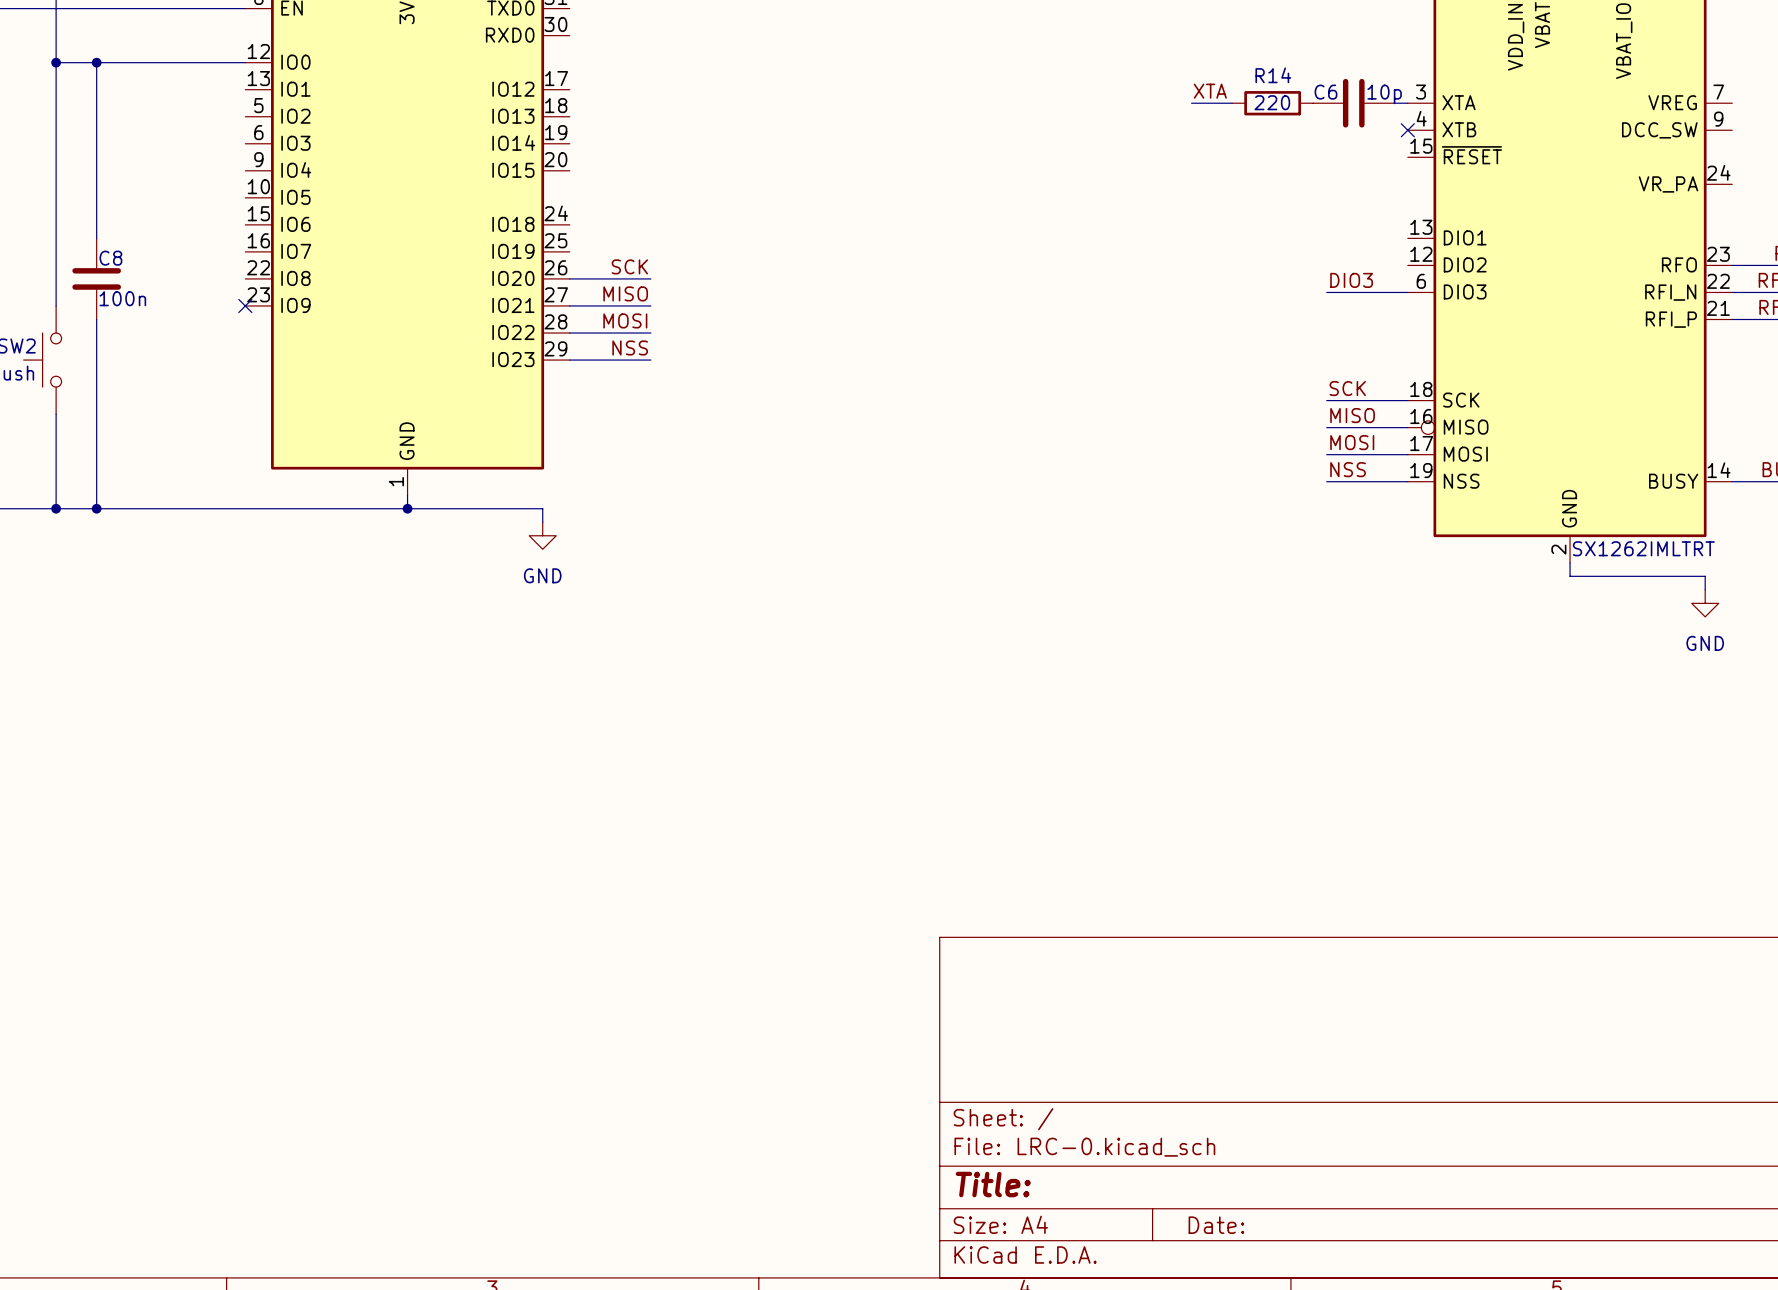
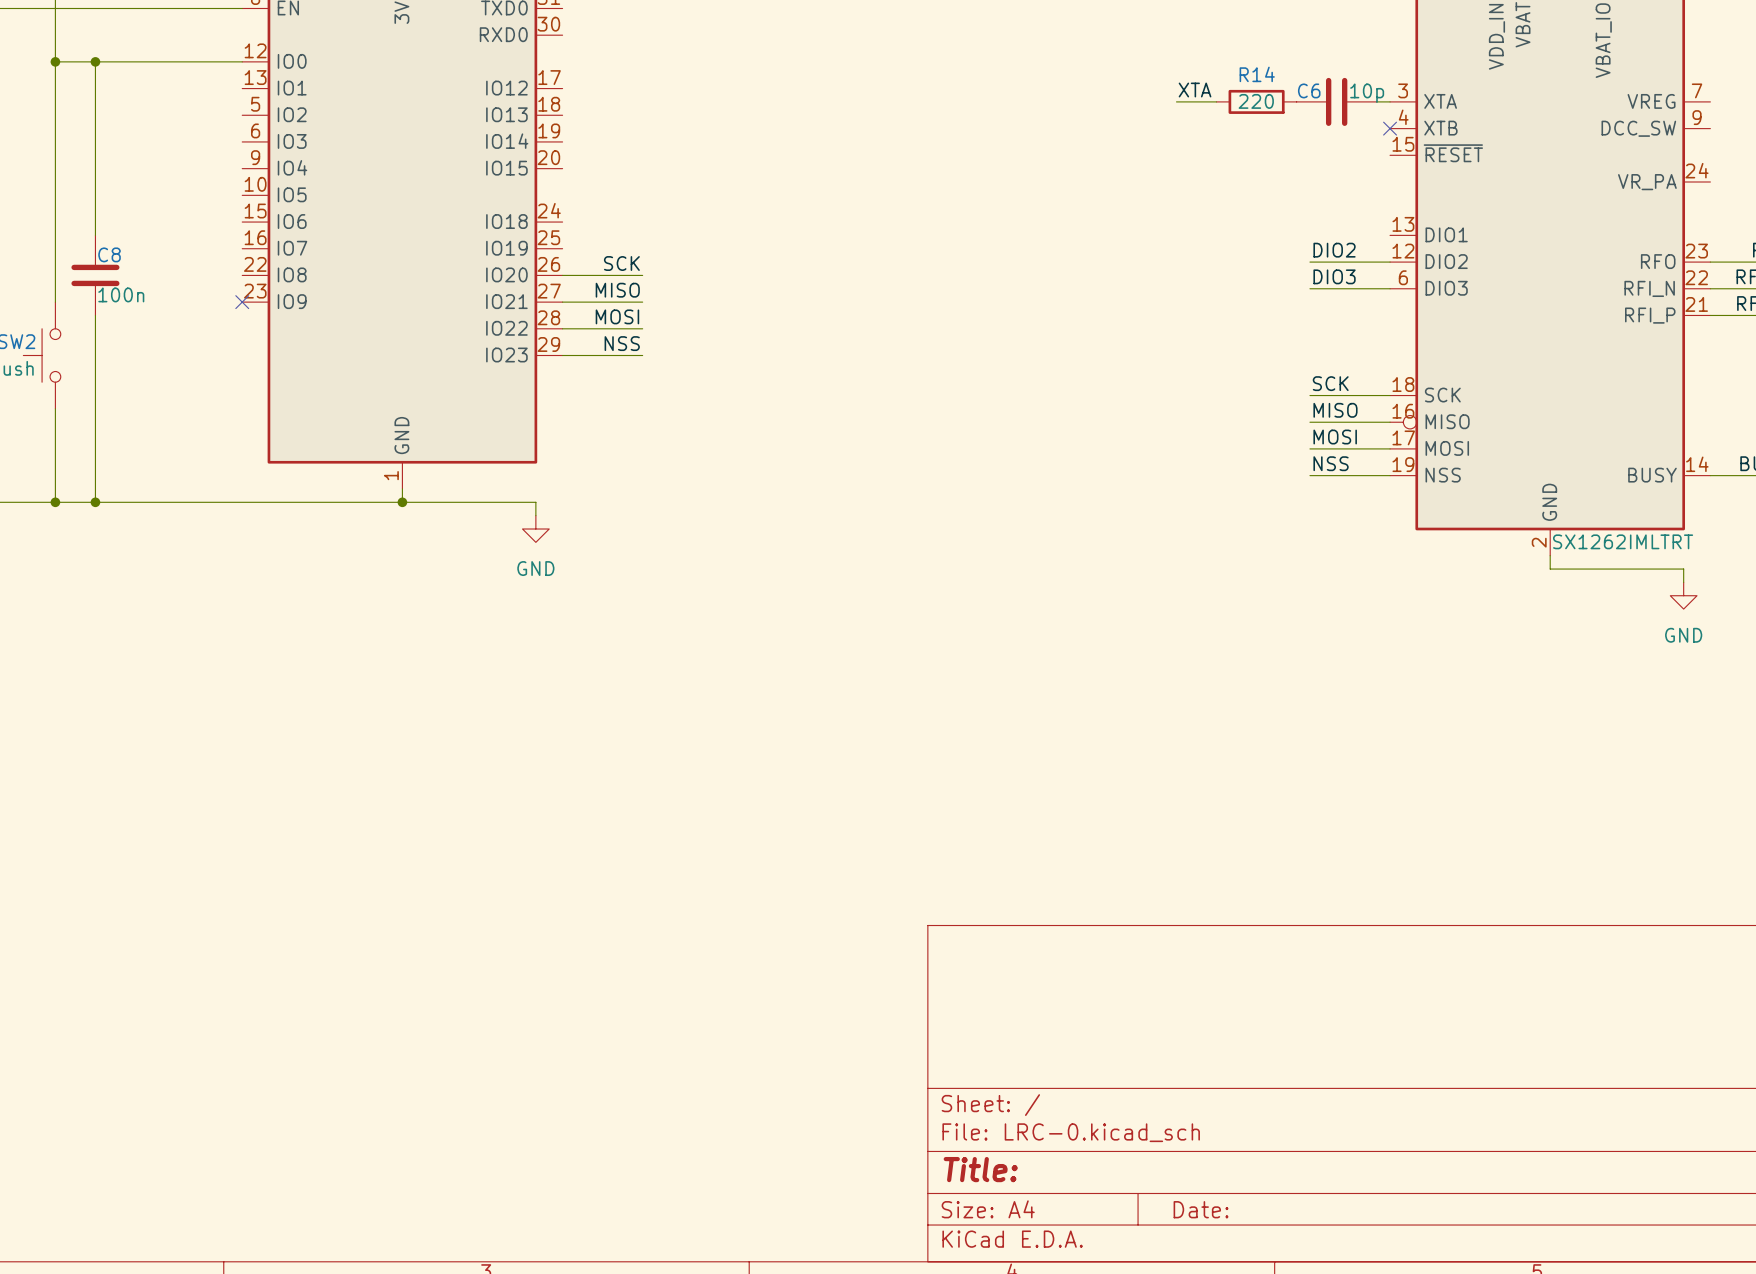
label: none -> DIO2 (1334, 250)
wire: none -> (1309, 262) (1390, 262)

